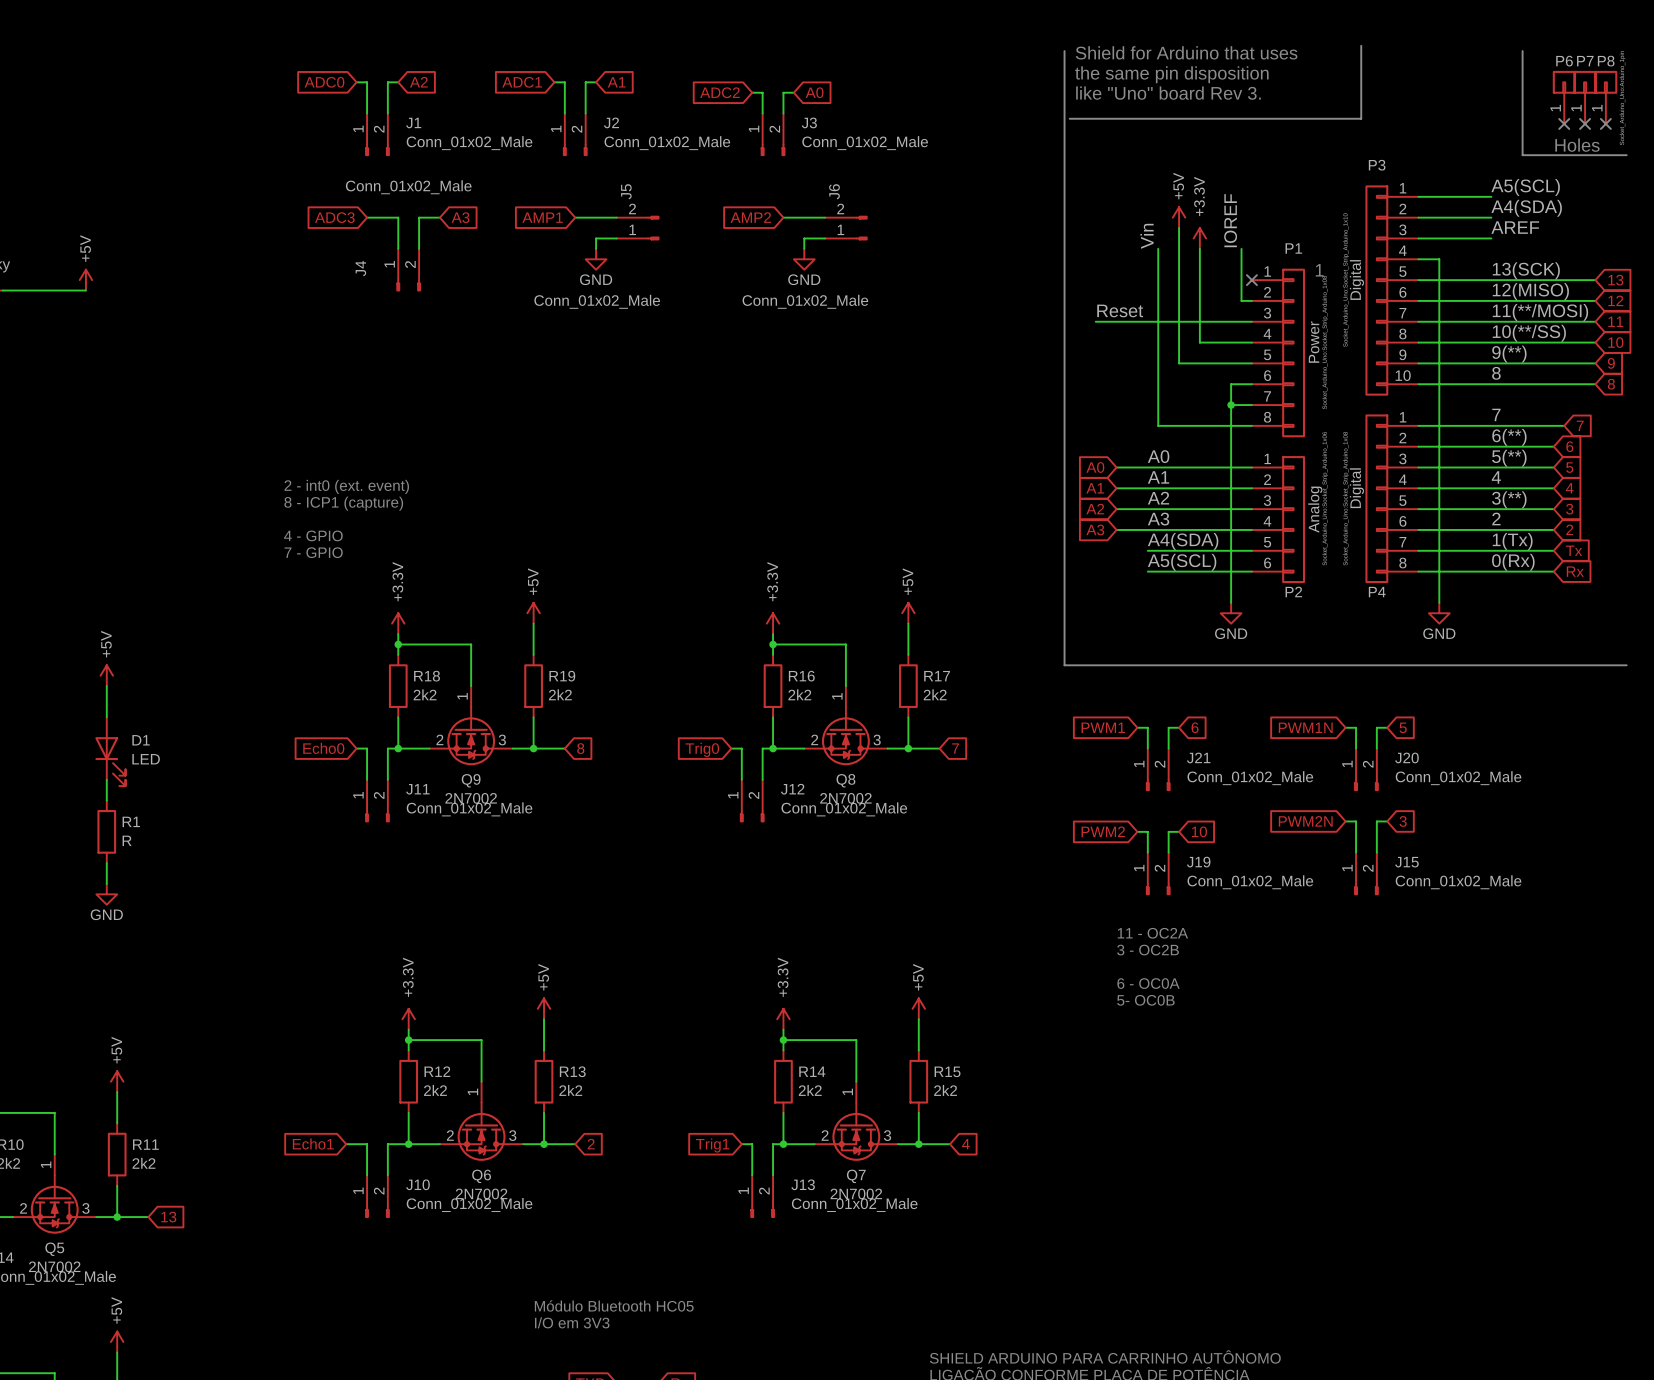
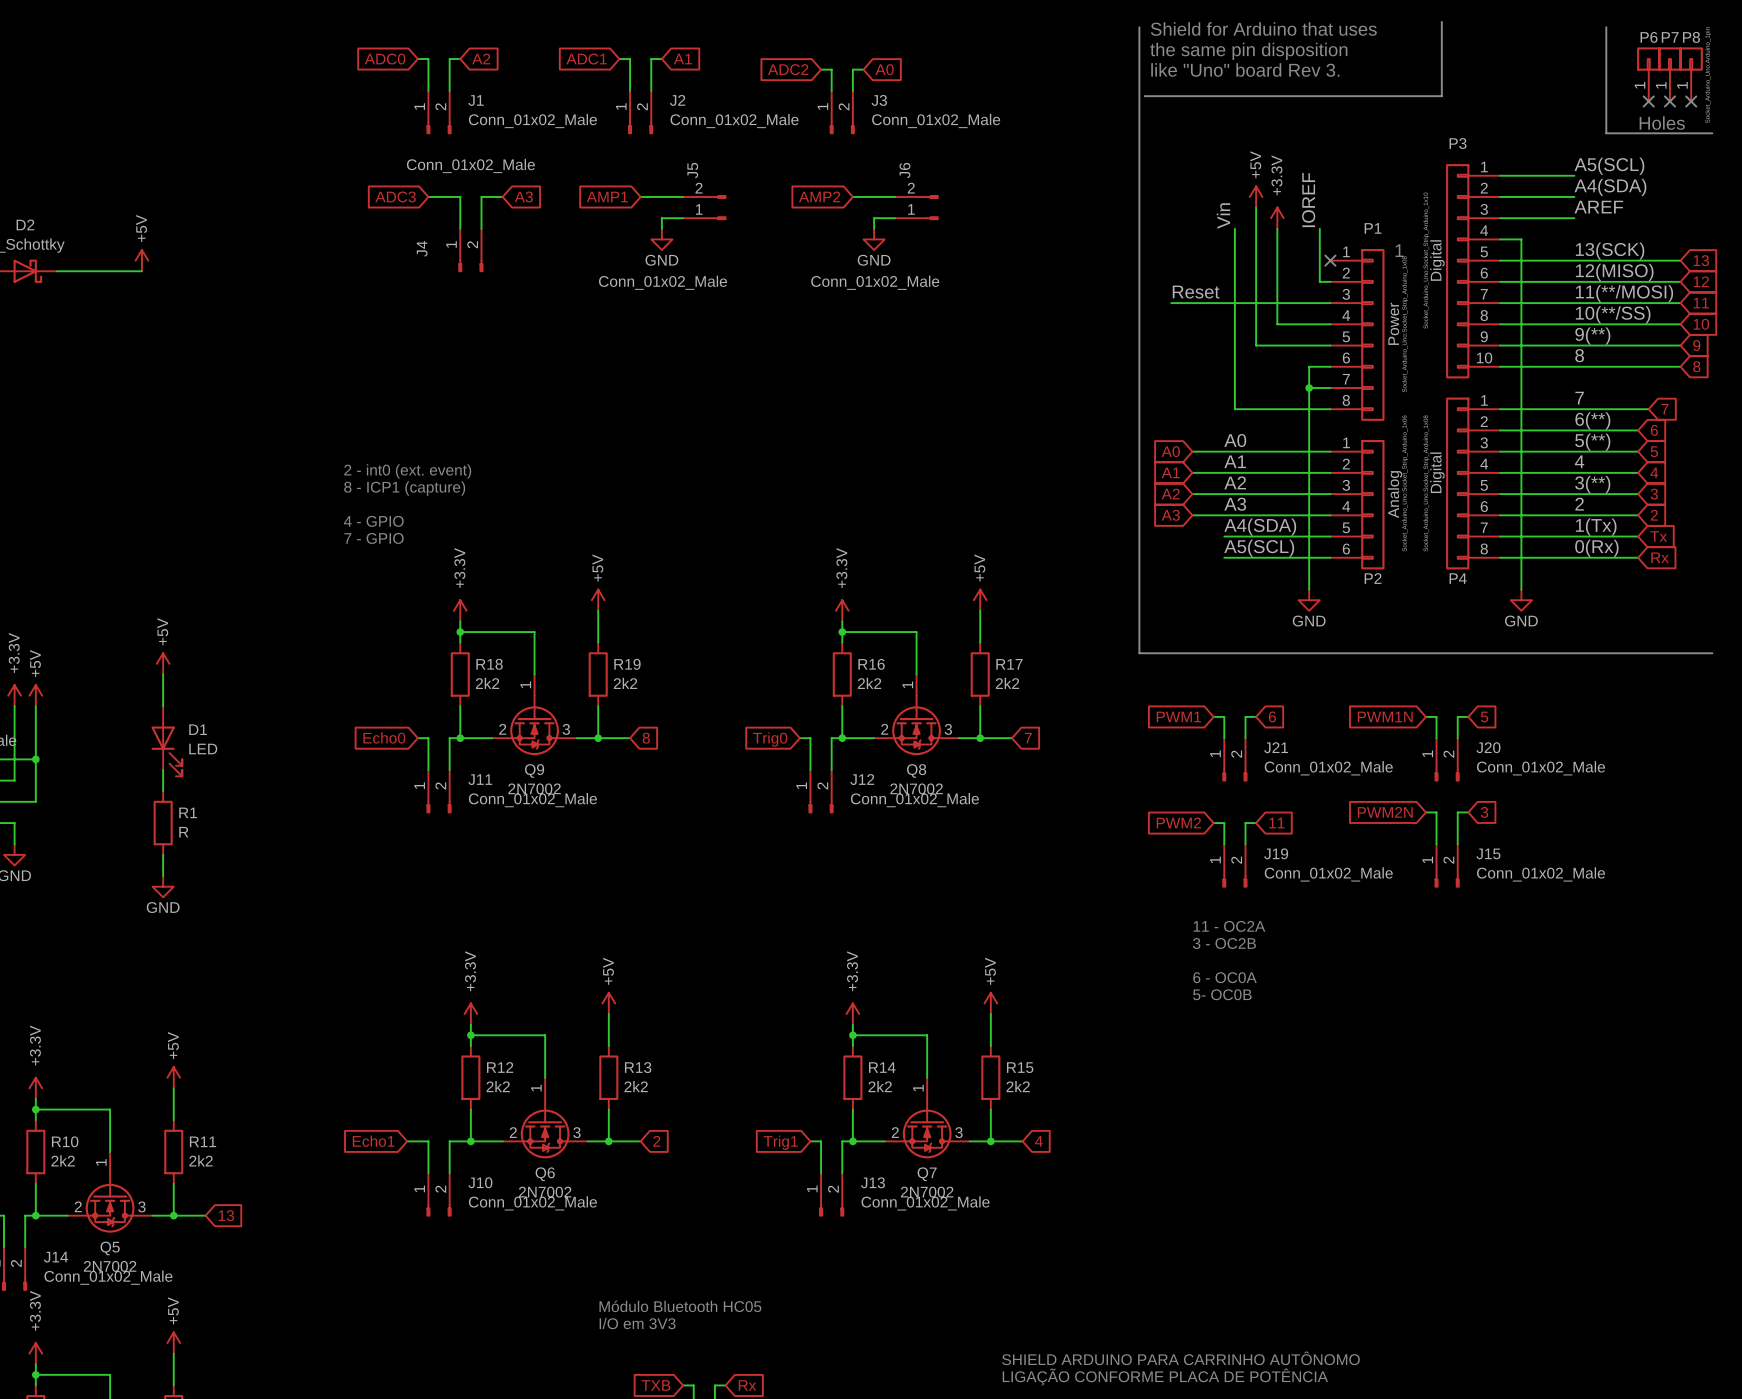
global label: 10 (1199, 831) -> 11 (1276, 823)

